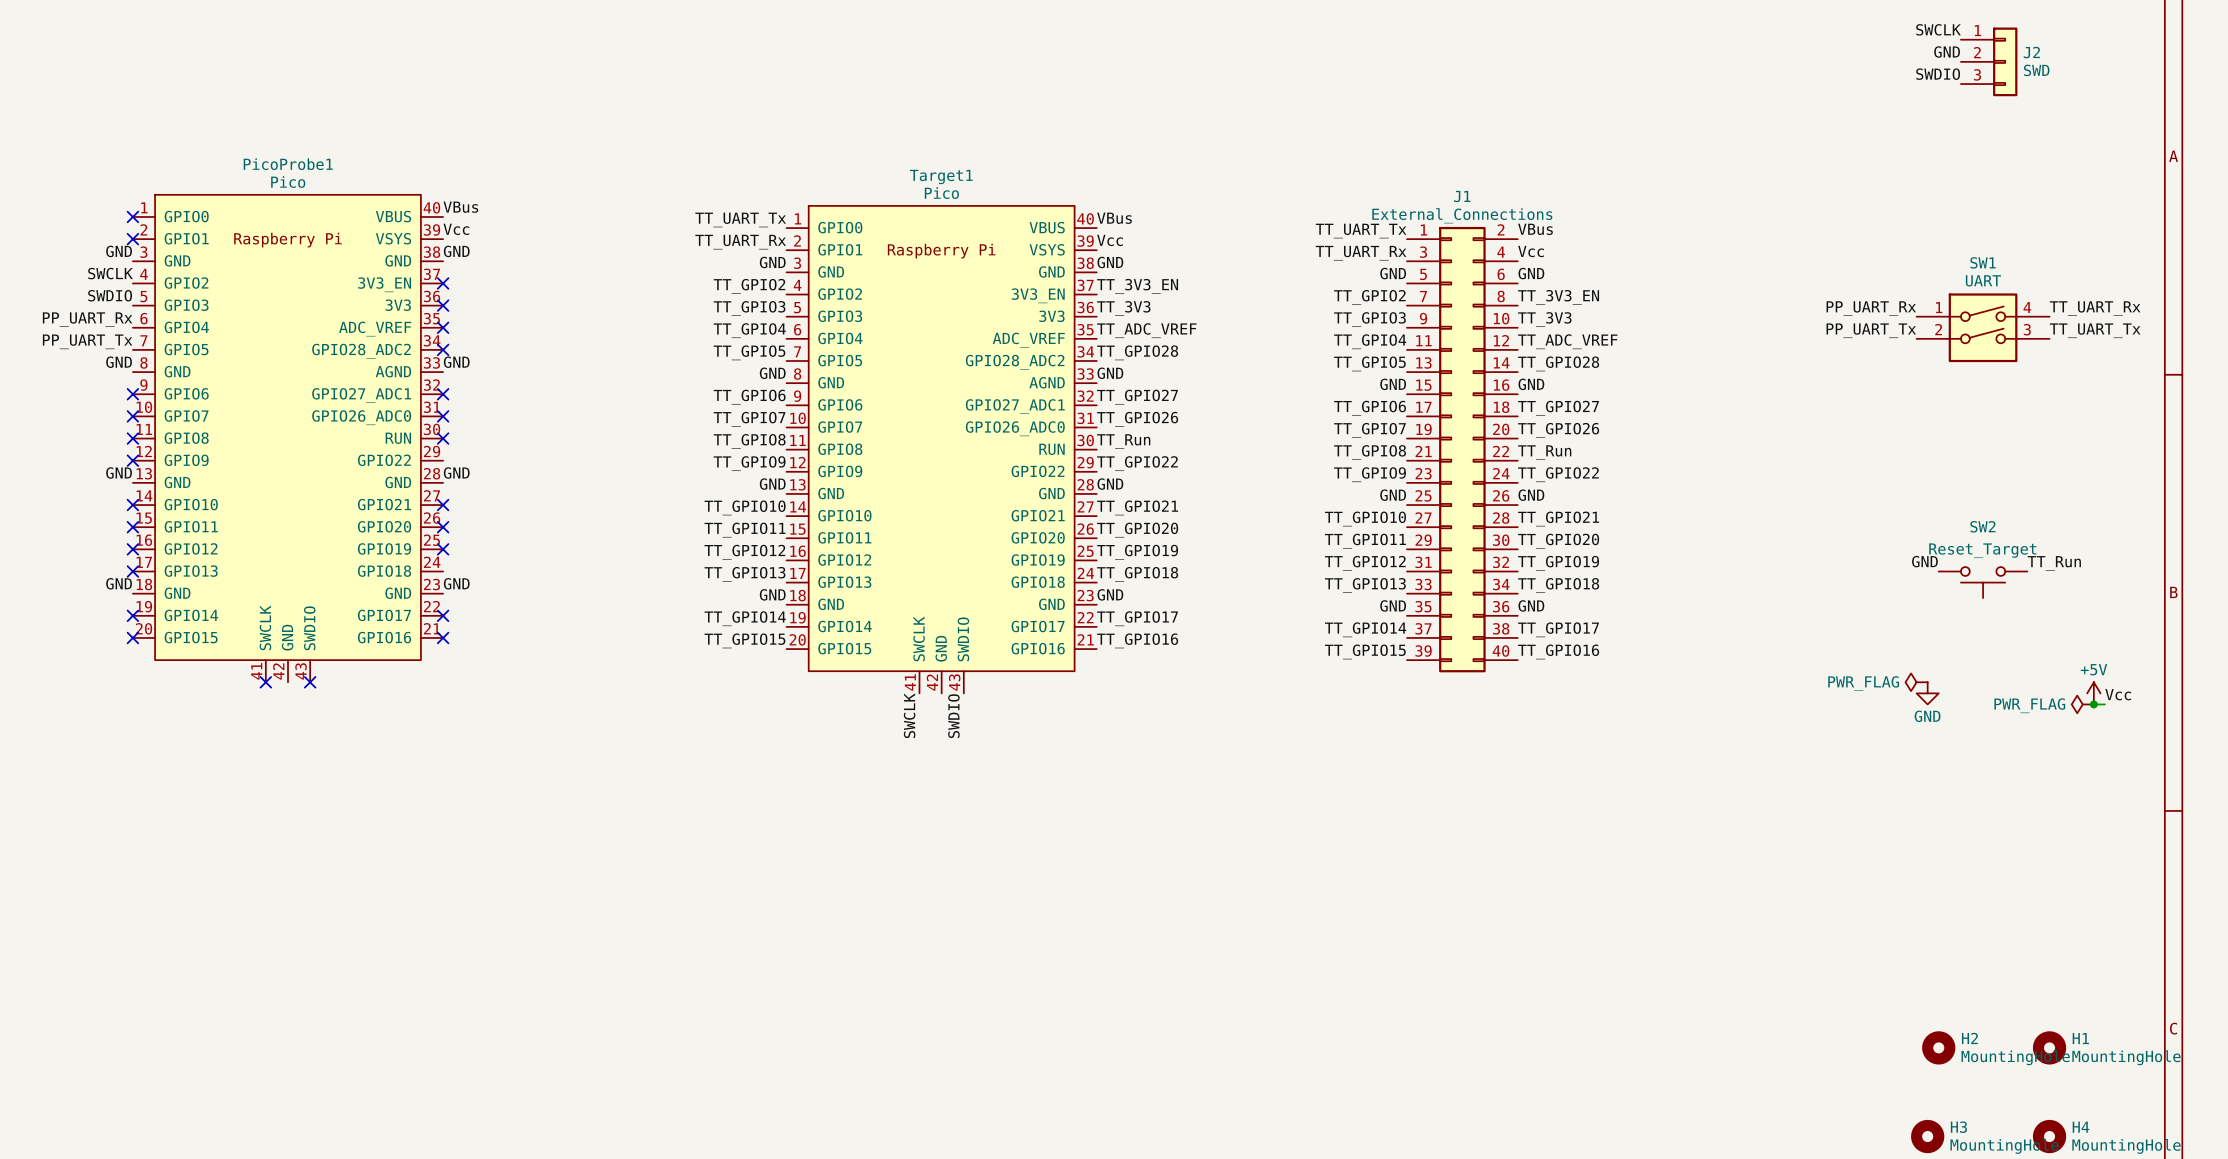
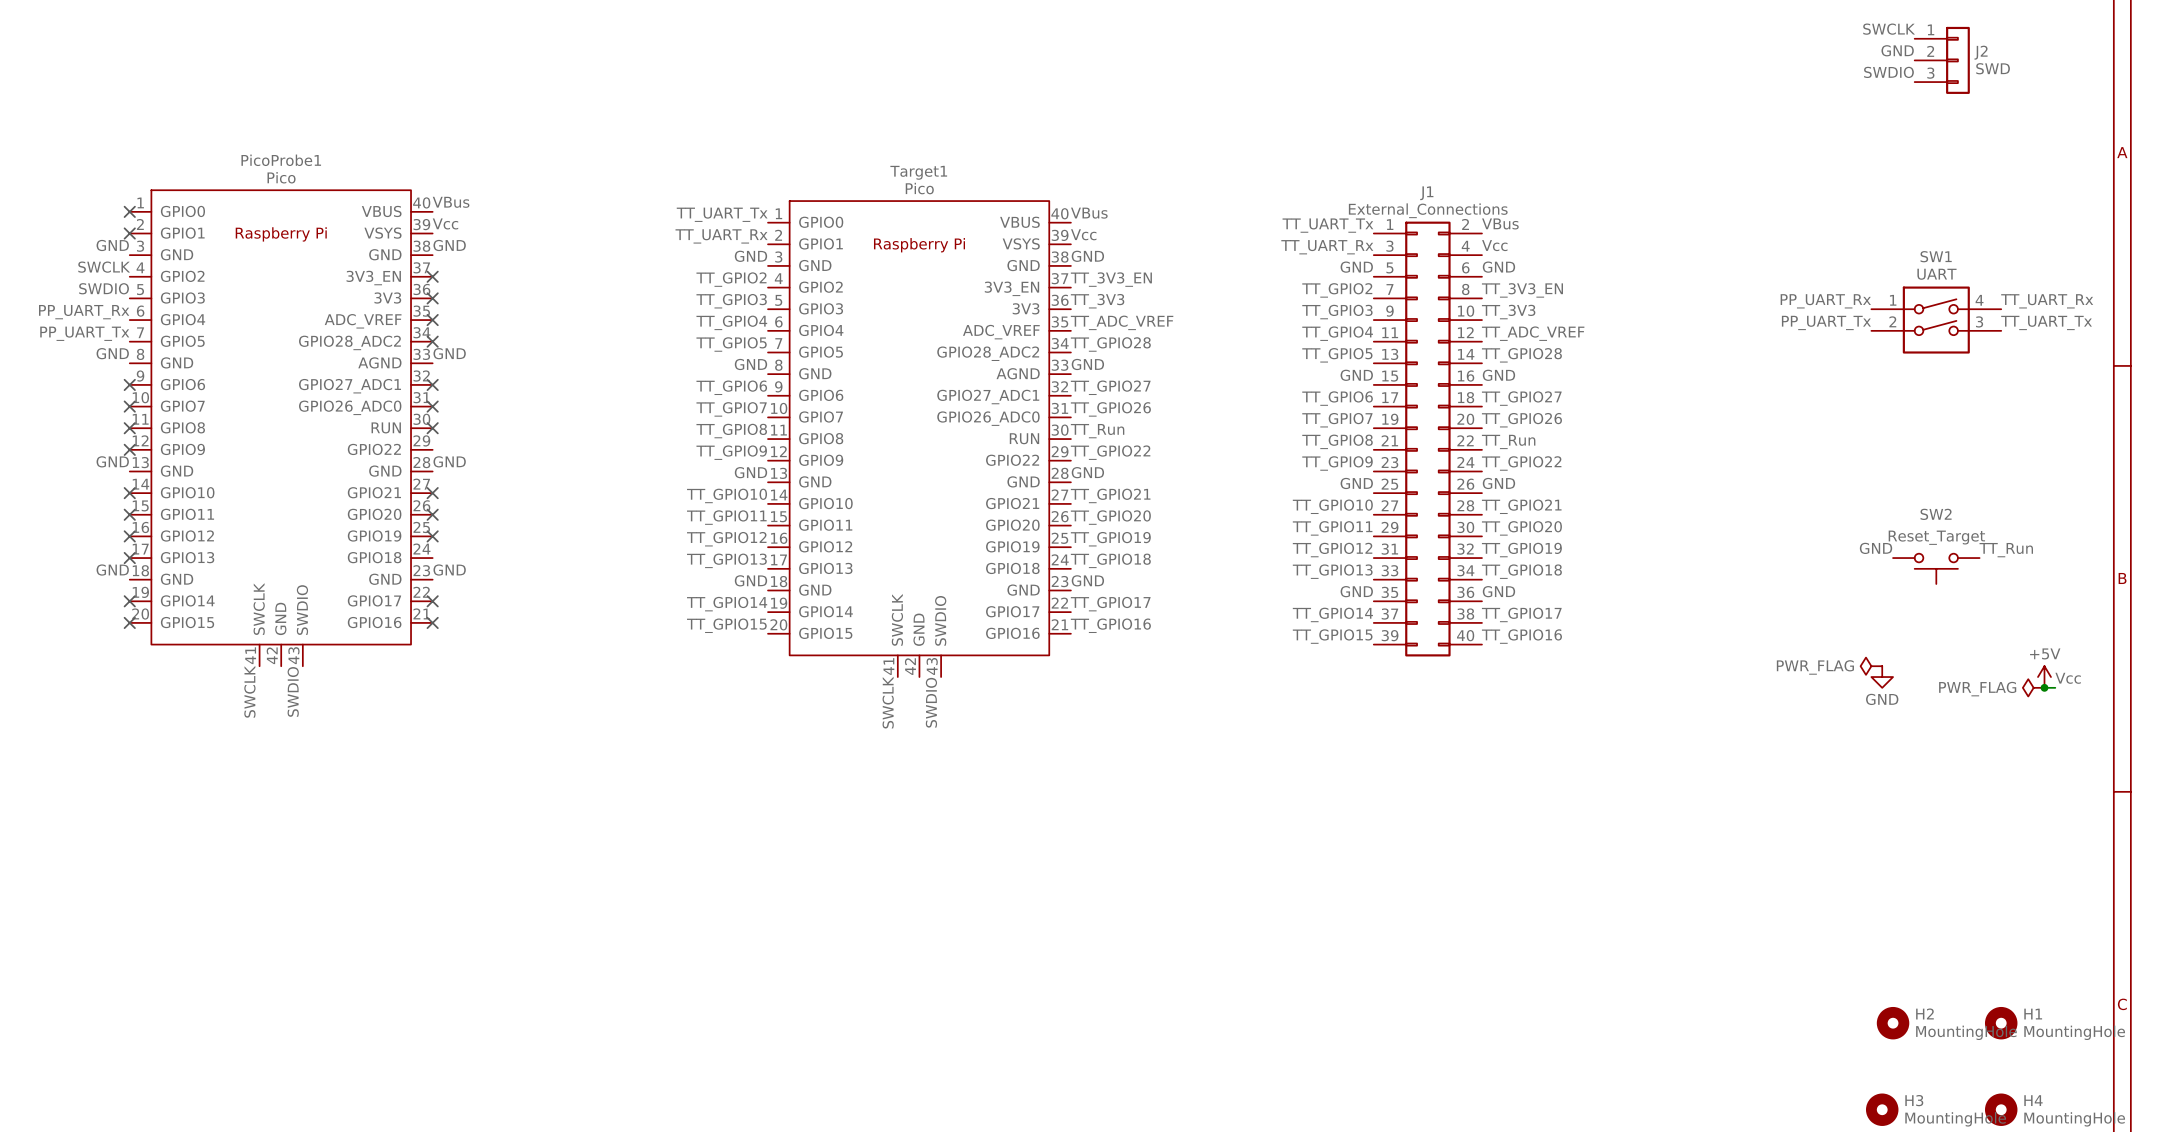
no-connect mark: (265, 682) -> none
no-connect mark: (310, 682) -> none
label: none -> SWCLK (249, 691)
label: none -> SWDIO (293, 691)

